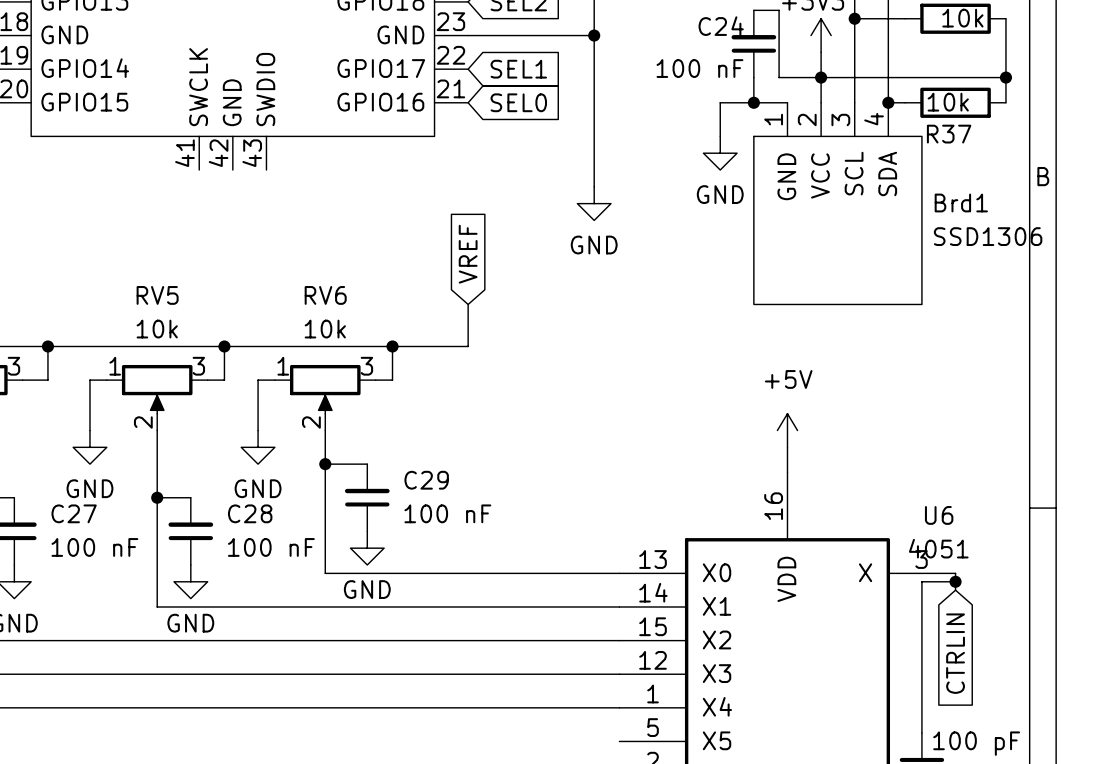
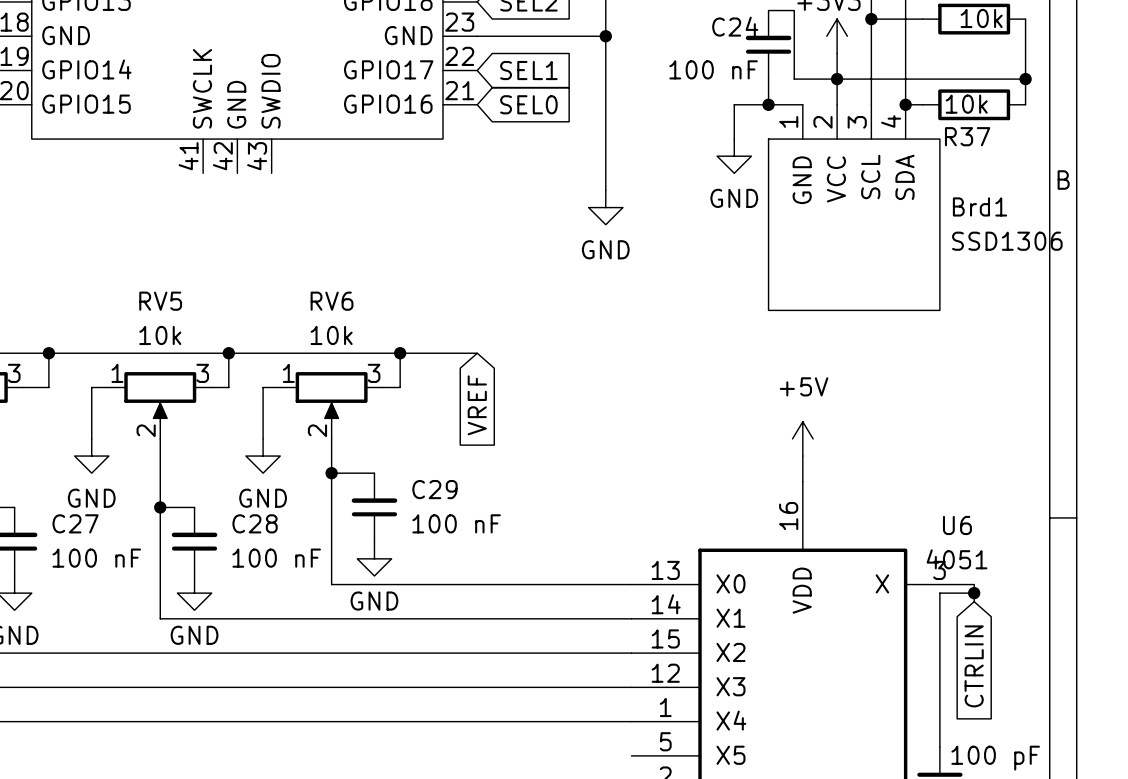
global label rotation: 0° (468, 254) -> 180° (477, 405)
global label position: VREF (468, 254) -> VREF (477, 405)
wire: (468, 304) (468, 346) -> none

